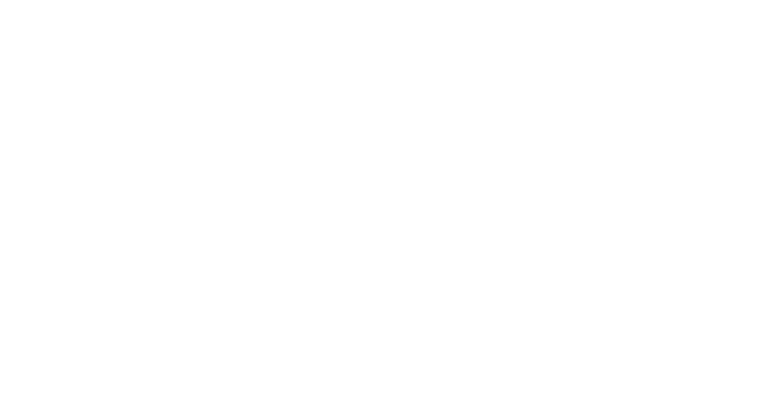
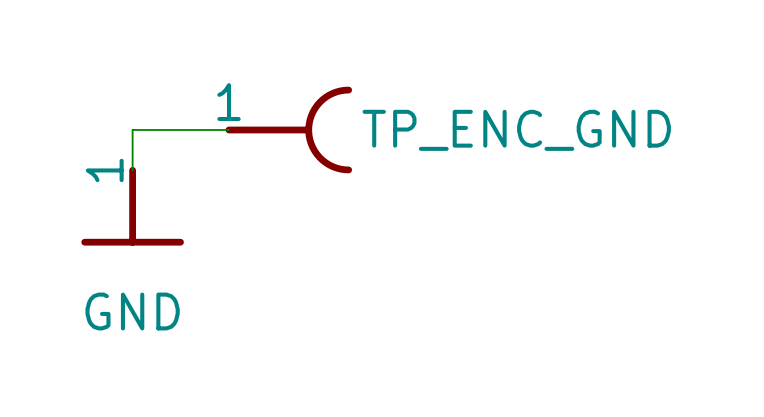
wire: none -> (228, 129) (132, 129) (132, 170)
TP_ENC_GND: none -> (288, 129)
GND: none -> (132, 206)

